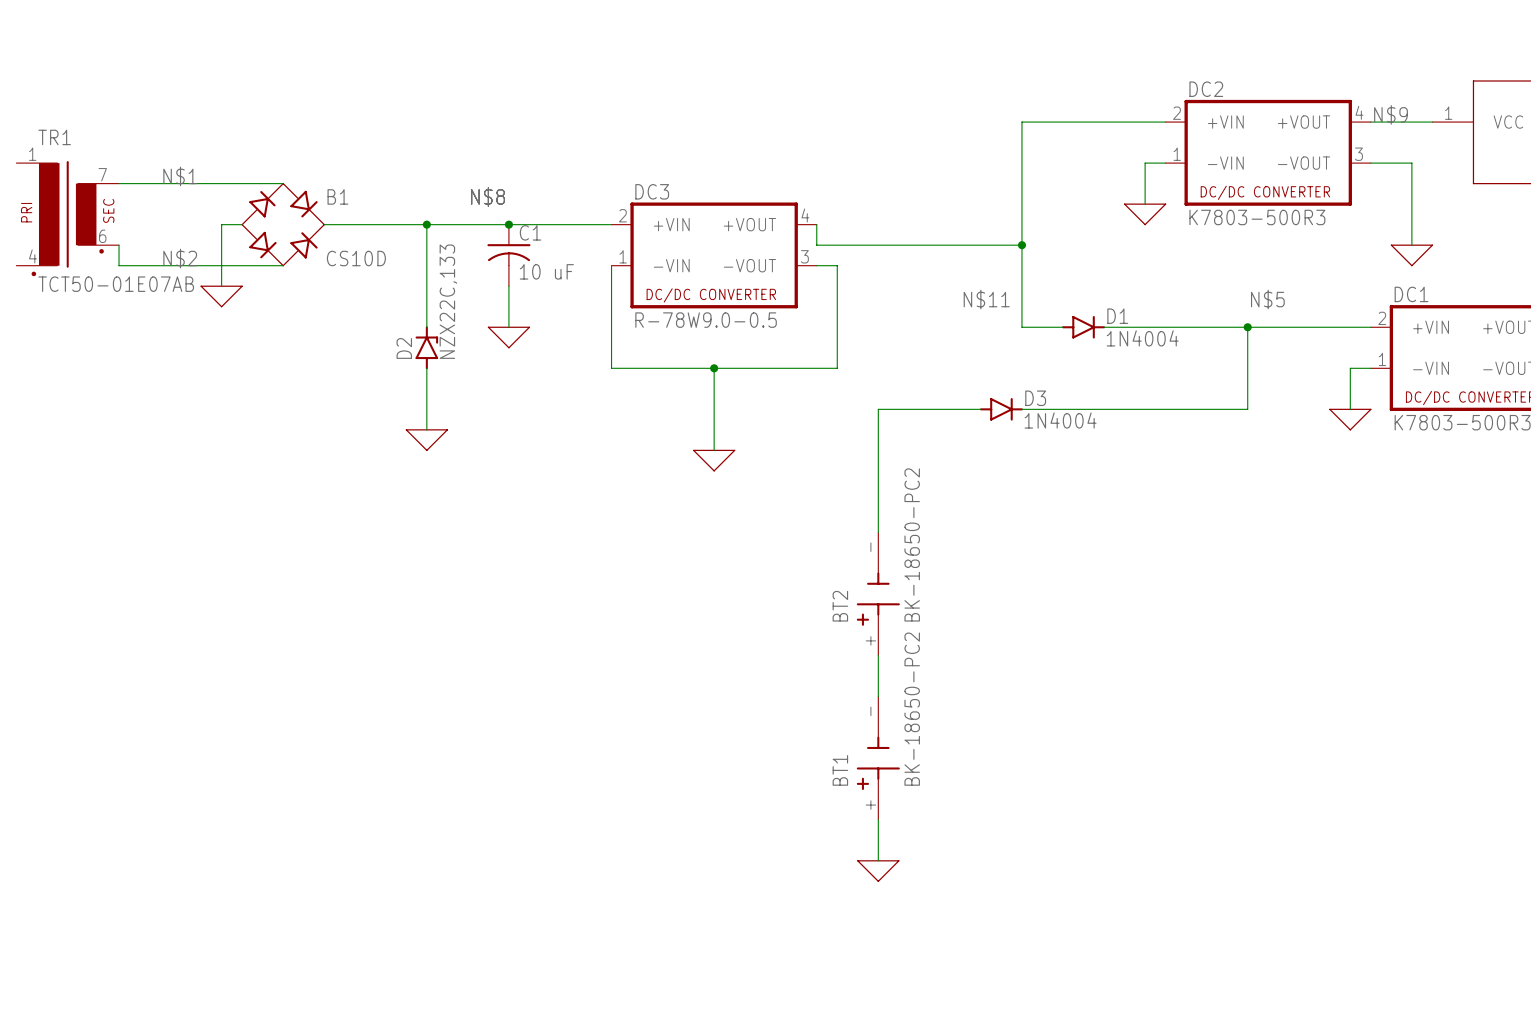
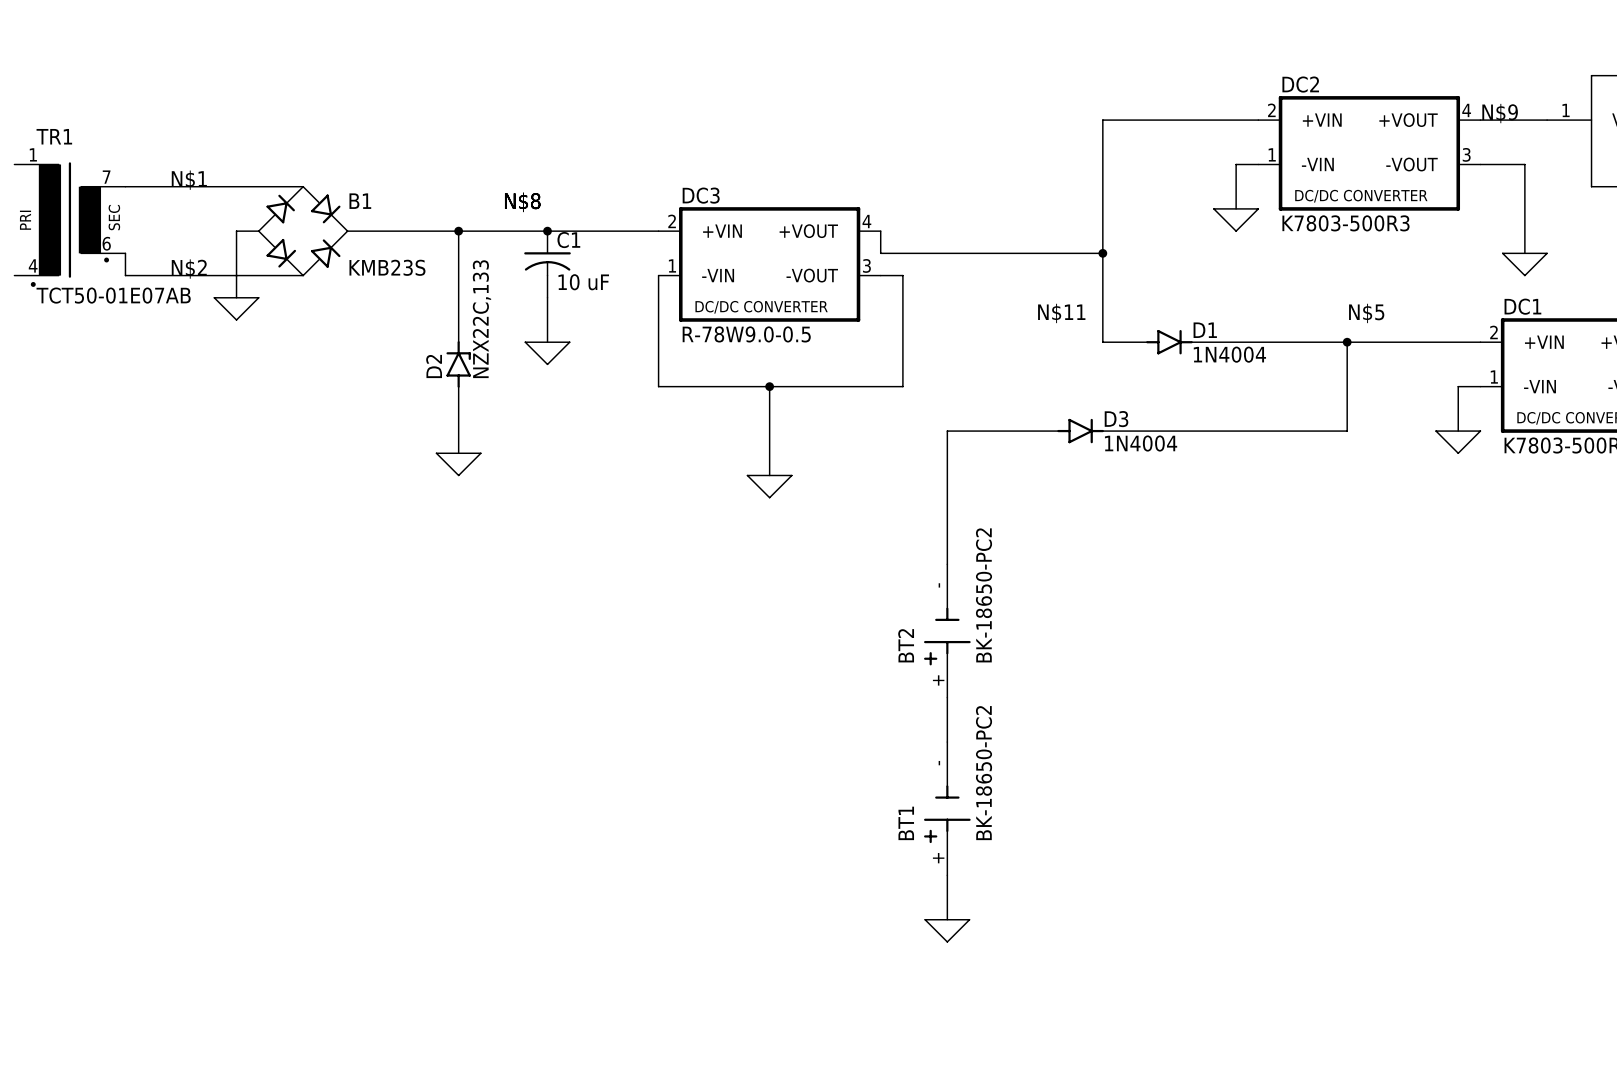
B1 value: CS10D (356, 258) -> KMB23S (387, 267)

